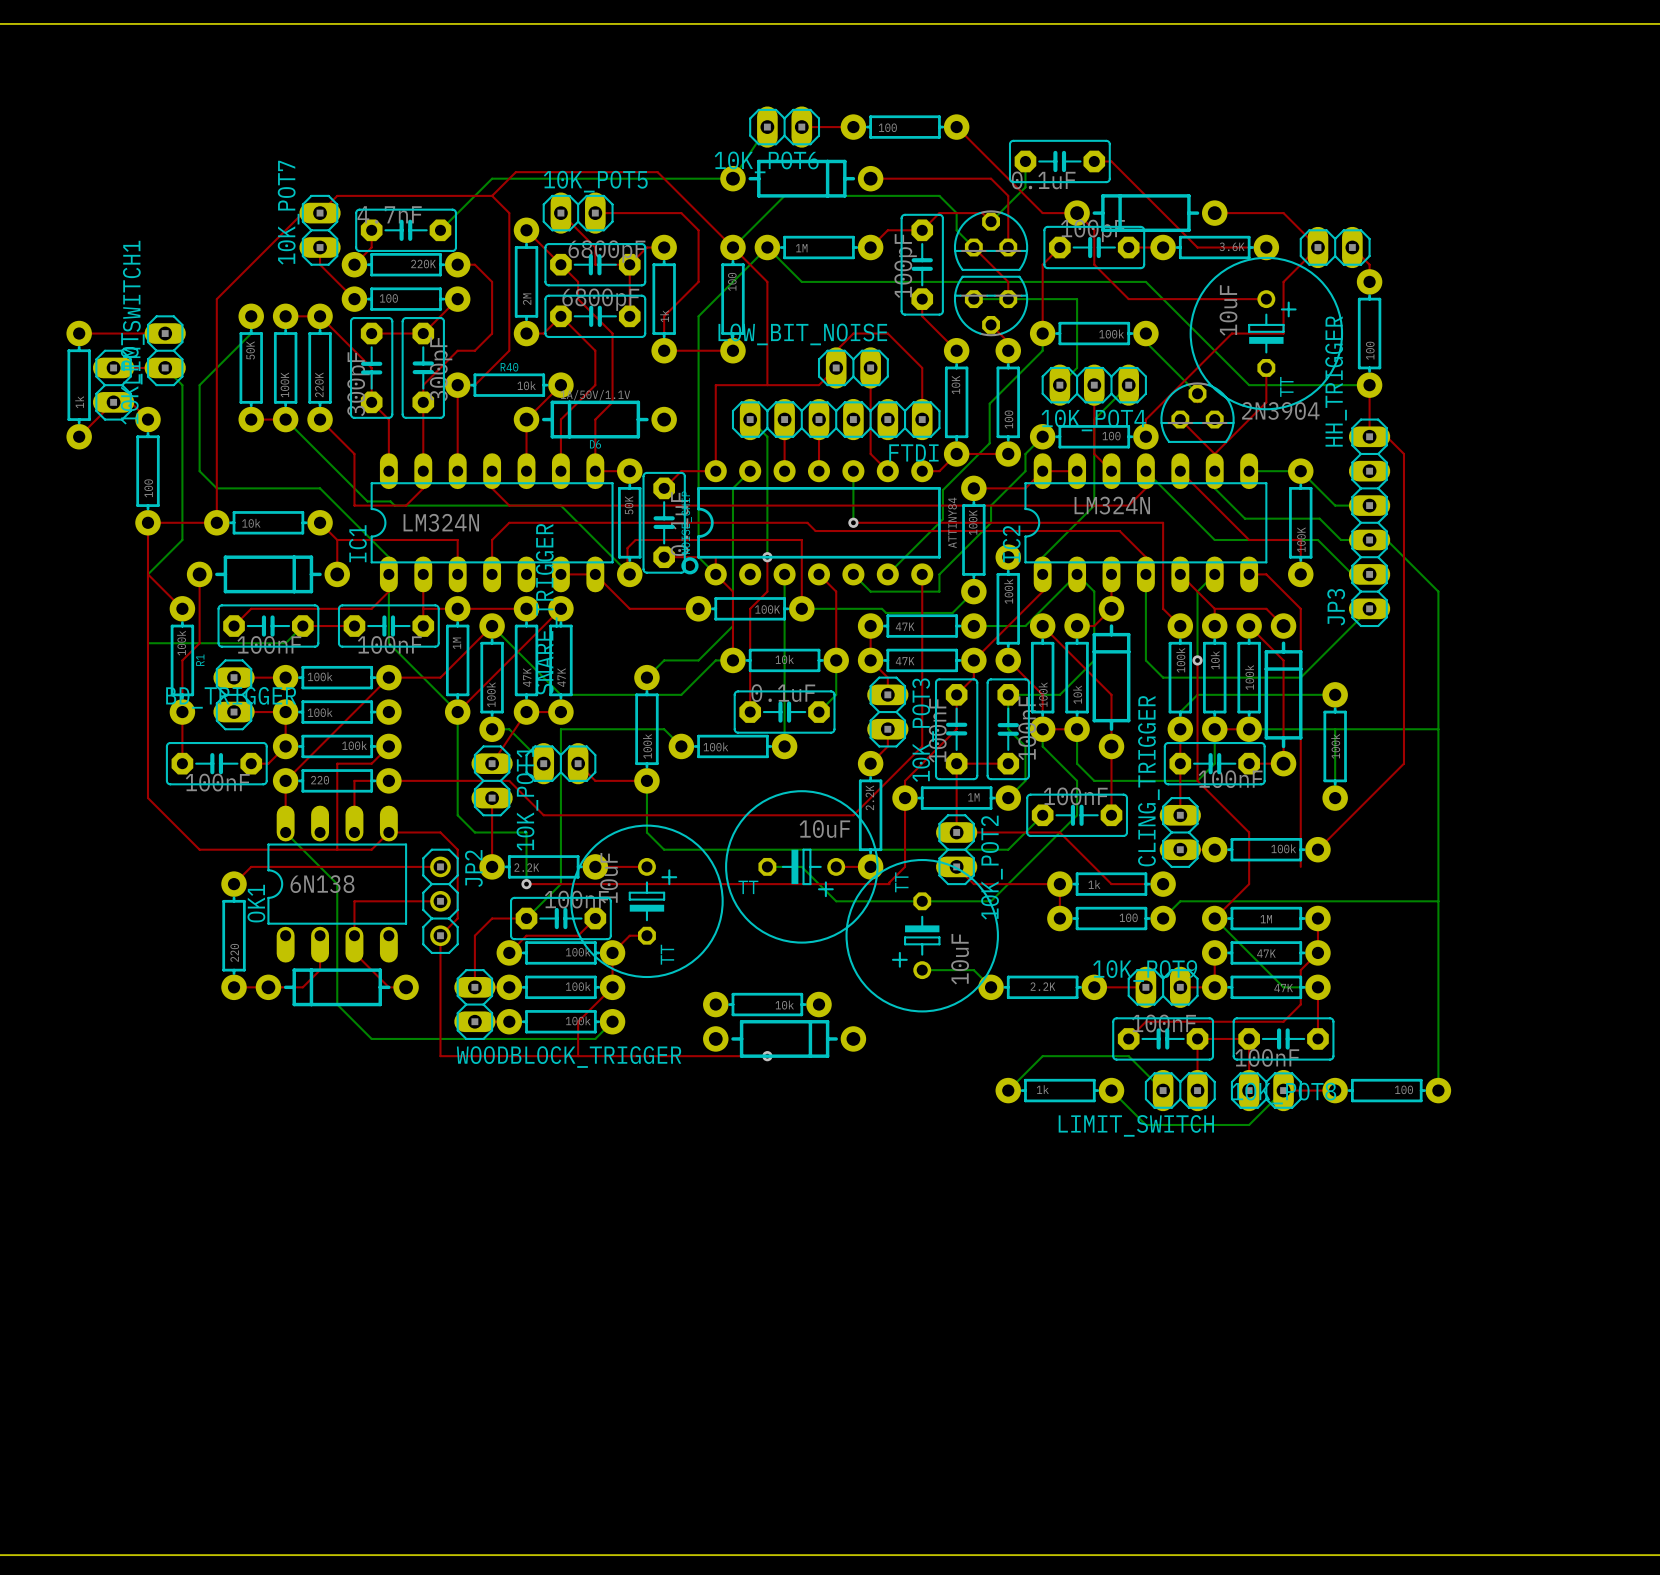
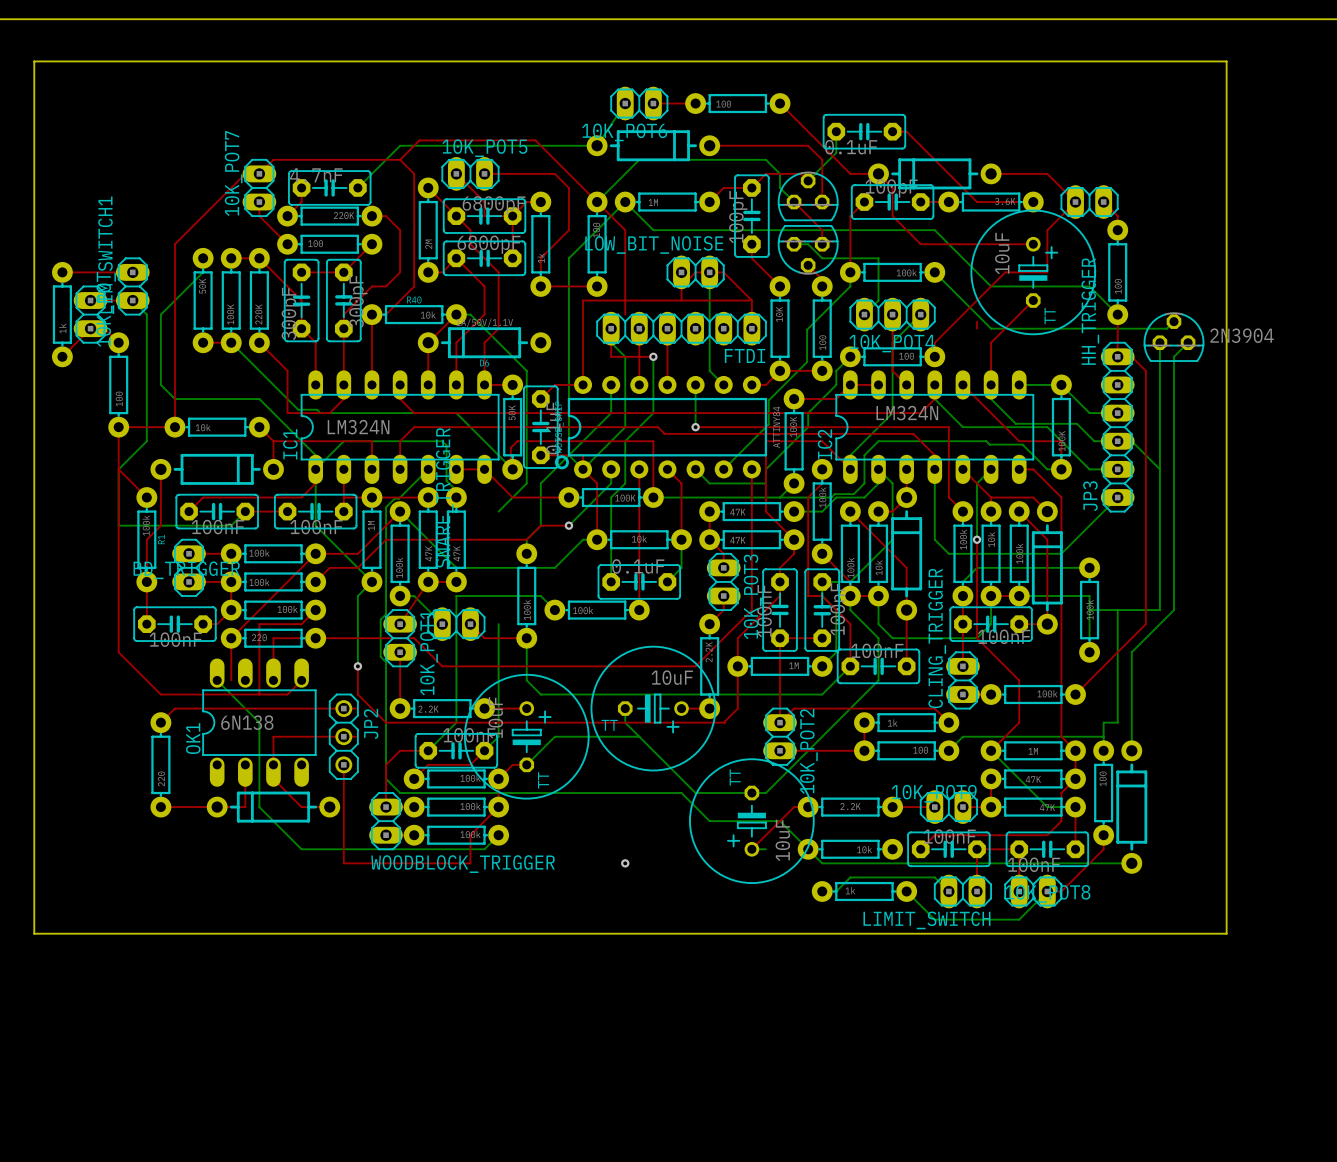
board edge: none -> (34, 61) (1226, 61) (1226, 933) (34, 933) (34, 61)
bottom track: (991, 299) (1077, 299) (1077, 316) -> (808, 244) (822, 258) (878, 258)
bottom track: none -> (709, 272) (709, 370) (723, 384)
bottom track: (1145, 333) (1145, 342) (1197, 393) -> (934, 272) (991, 328) (1166, 328) (1174, 321)
bottom track: (1214, 350) (1249, 385) (1369, 385) -> (991, 286) (1089, 286) (1117, 314)
top track: (836, 367) (819, 385) (715, 385) -> (751, 300) (583, 300) (583, 314)
LOW_BIT_NOISE position: (853, 367) -> (695, 272)
top track: (870, 367) (870, 453) (887, 471) -> none
top track: (1266, 367) (1266, 402) (1214, 453) (1180, 419) -> (1033, 300) (991, 342) (991, 370)
bottom track: none -> (456, 314) (470, 314) (526, 370) (526, 483) (498, 511)
top track: none -> (611, 328) (611, 356) (653, 356)
part position: (1197, 412) -> (1174, 337)
FTDI position: (836, 419) -> (681, 328)
bottom track: none -> (1159, 342) (1159, 610) (1089, 610)
bottom track: none -> (653, 356) (653, 413) (625, 441)
via: none -> (653, 356)
bottom track: (750, 471) (732, 488) (732, 626) (698, 660) (664, 660) (646, 677) -> (611, 384) (611, 413) (540, 483) (540, 525) (526, 539) (526, 553)
bottom track: (1145, 471) (1214, 540) (1317, 540) (1352, 574) -> (934, 384) (934, 399) (962, 427) (1047, 427) (1089, 469) (1103, 469)
bottom track: (767, 522) (767, 540) -> (625, 427) (583, 469)
top track: (767, 557) (767, 591) (750, 608) (750, 712) -> none
bottom track: none -> (625, 455) (625, 483) (611, 497) (611, 581)
via: (767, 557) -> none
bottom track: none -> (315, 469) (343, 441) (442, 441) (446, 445) (446, 480) (456, 490) (456, 497)
bottom track: none -> (428, 469) (398, 498) (394, 498) (386, 507) (386, 614) (380, 619) (380, 656) (386, 662) (386, 778) (400, 793) (681, 793) (709, 821) (780, 821) (822, 863) (850, 863)
bottom track: none -> (611, 469) (611, 483) (568, 525)
top track: none -> (639, 469) (639, 610)
bottom track: (784, 574) (784, 746) -> none
top track: none -> (822, 469) (822, 483) (808, 497) (808, 596) (822, 596) (850, 624) (850, 666)
top track: (1042, 574) (1042, 591) (973, 660) -> (850, 469) (822, 441) (765, 441) (765, 511) (794, 539)
bottom track: (1077, 574) (1059, 591) -> (1061, 469) (1047, 469) (1022, 444) (989, 444) (986, 441) (878, 441) (864, 455) (864, 483)
bottom track: (1421, 574) (1438, 591) -> (1188, 342) (1174, 356) (1174, 483)
bottom track: (1046, 604) (1025, 626) (1008, 626) -> (878, 469) (878, 483) (864, 497) (836, 497) (822, 511)
top track: (560, 608) (457, 712) -> none
bottom track: (881, 608) (886, 612) (952, 612) (956, 608) -> (718, 497) (831, 497) (834, 494) (853, 494)
part position: (1008, 608) -> (822, 511)
top track: none -> (568, 525) (540, 525) (526, 539) (386, 539) (357, 567) (329, 567) (315, 581)
via: none -> (568, 525)
top track: (1008, 660) (1042, 694) (1042, 712) -> (822, 553) (850, 581)
bottom track: (1059, 694) (1008, 694) (1008, 712) -> (864, 567) (850, 581) (822, 581)
bottom track: (457, 712) (457, 815) (474, 832) (526, 832) (526, 884) -> (371, 581) (357, 596) (357, 666)
part position: (956, 729) -> (780, 610)
part position: (1008, 729) -> (822, 610)
bottom track: (1335, 729) (1438, 729) -> none
bottom track: none -> (1117, 610) (1117, 722) (1103, 722) (1103, 750)
bottom track: (1438, 746) (1438, 1090) -> (1174, 610) (1131, 652) (1131, 750)
top track: (337, 763) (337, 780) -> (287, 638) (273, 638)
top track: none -> (273, 624) (259, 624) (259, 694)
bottom track: none -> (498, 624) (498, 736) (484, 750)
top track: (1008, 763) (956, 763) (956, 780) -> (822, 638) (780, 638)
top track: (354, 780) (354, 832) -> none
bottom track: (1025, 780) (1008, 798) -> (836, 638) (836, 652) (822, 666)
part position: (956, 798) -> (780, 666)
top track: none -> (357, 666) (357, 694) (386, 722) (428, 722)
via: none -> (357, 666)
bottom track: (1077, 815) (991, 901) (836, 901) (801, 866) (767, 866) -> (751, 793) (695, 793) (625, 722) (625, 708)
bottom track: (285, 832) (337, 884) (337, 1004) -> (217, 680) (259, 722) (259, 807) (273, 821)
top track: (337, 832) (337, 849) -> none
top track: none -> (301, 680) (287, 694)
top track: (956, 832) (1059, 832) (1111, 884) (1163, 884) -> (780, 680) (780, 722) (794, 708) (934, 708) (948, 722)
top track: (354, 849) (371, 849) (388, 832) (440, 832) (457, 849) (457, 918) (440, 935) (440, 1056) -> (343, 764) (343, 863) (357, 863)
10K_POT2 position: (956, 849) -> (780, 736)
top track: (251, 866) (234, 884) -> (203, 708) (174, 708) (160, 722)
top track: (956, 866) (973, 884) (1059, 884) -> none
top track: none -> (1061, 708) (1061, 736) (1075, 750)
JP2 name position: JP2 (473, 868) -> JP2 (371, 723)
OK1 position: (337, 884) -> (259, 722)
via: (526, 884) -> none
top track: (354, 901) (354, 952) (388, 987) -> (287, 736) (273, 736) (273, 778) (301, 807) (315, 807)
JP2 position: (440, 901) -> (343, 736)
bottom track: none -> (639, 736) (554, 736) (526, 764)
bottom track: (1352, 901) (1438, 901) -> none
top track: none -> (780, 750) (864, 750)
part position: (234, 935) -> (160, 764)
top track: (320, 935) (320, 970) (302, 987) -> (245, 764) (245, 807)
part position: (922, 935) -> (751, 821)
bottom track: (939, 970) (973, 970) (991, 987) -> (765, 793) (878, 680) (878, 666)
top track: none -> (160, 807) (189, 807)
top track: none -> (808, 807) (794, 807) (751, 849)
part: none -> (1131, 807)
part position: (767, 1004) -> (850, 849)
part: (784, 1038) -> none
bottom track: none -> (751, 849) (765, 849)
top track: (578, 1056) (767, 1056) -> none
bottom track: (1042, 1056) (1008, 1090) -> (934, 877) (850, 877) (836, 891) (822, 891)
bottom track: (1128, 1056) (1145, 1073) -> (920, 863) (1131, 863)
top track: (1300, 1090) (1335, 1090) -> (1061, 891) (1103, 849) (1103, 835)
part rotation: 0° (1386, 1090) -> 90° clockwise (1103, 793)
part position: (1386, 1090) -> (1103, 793)

